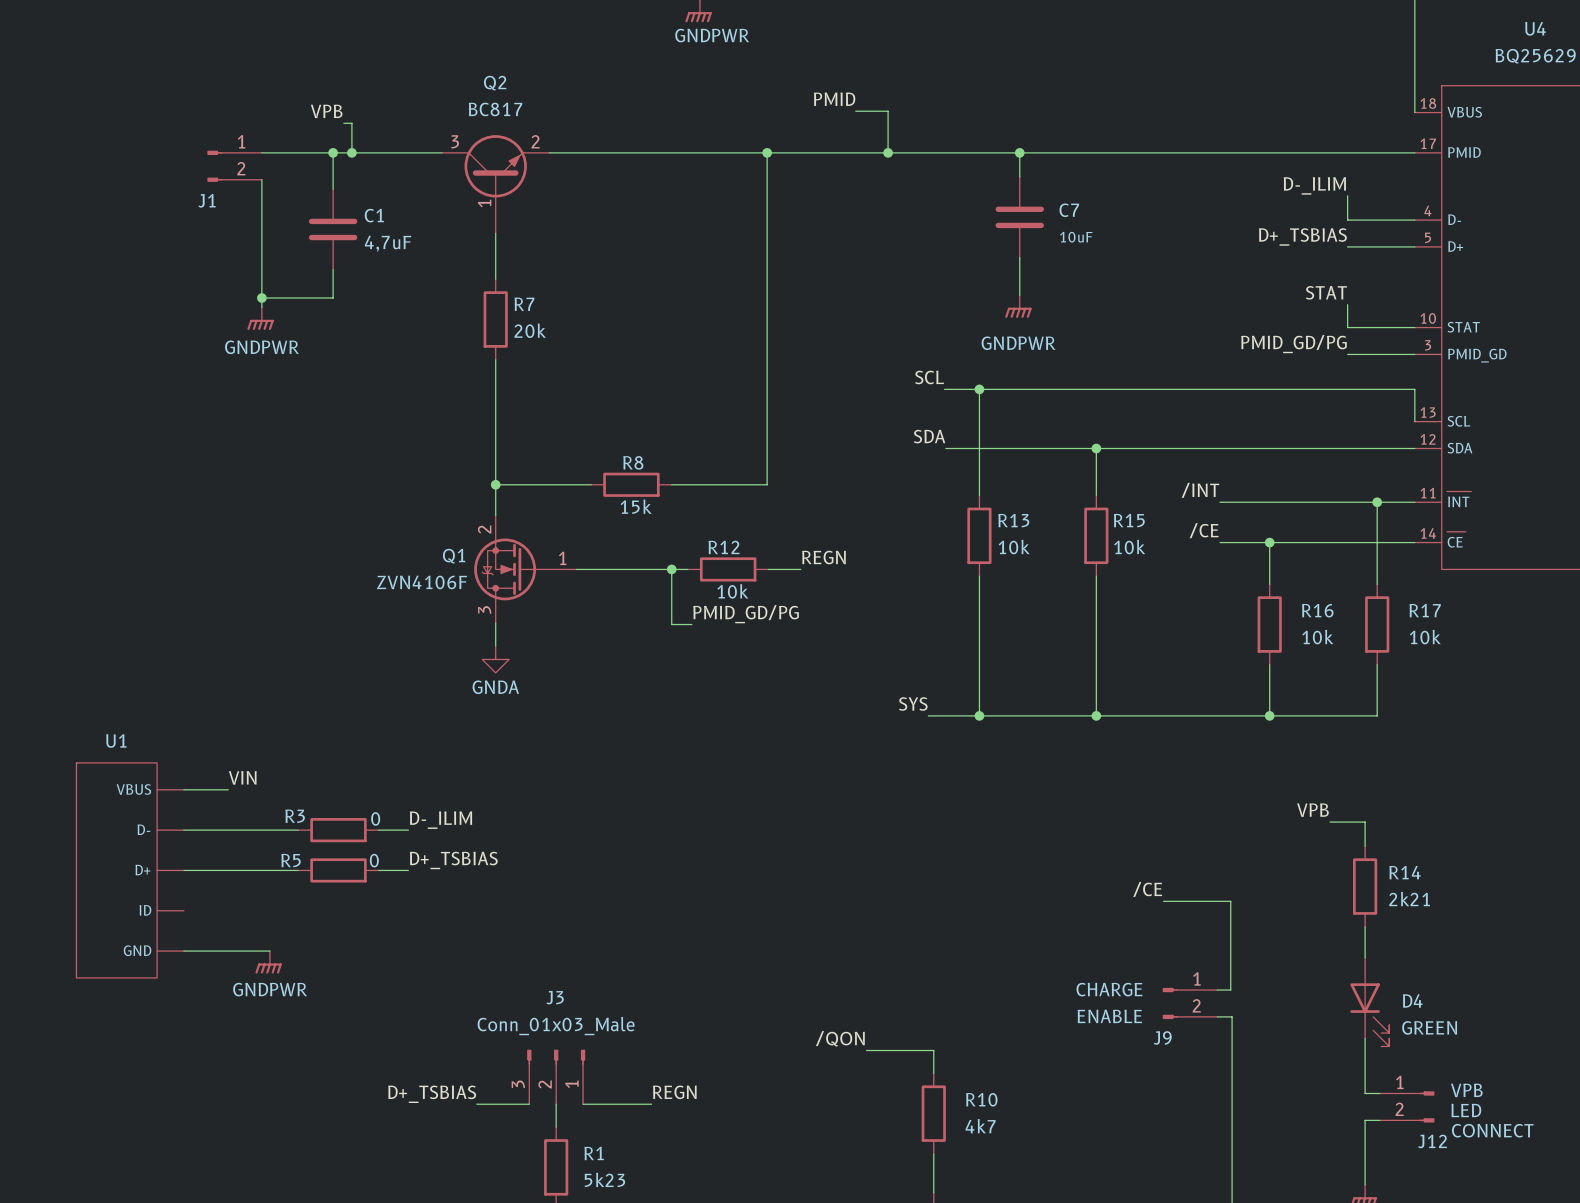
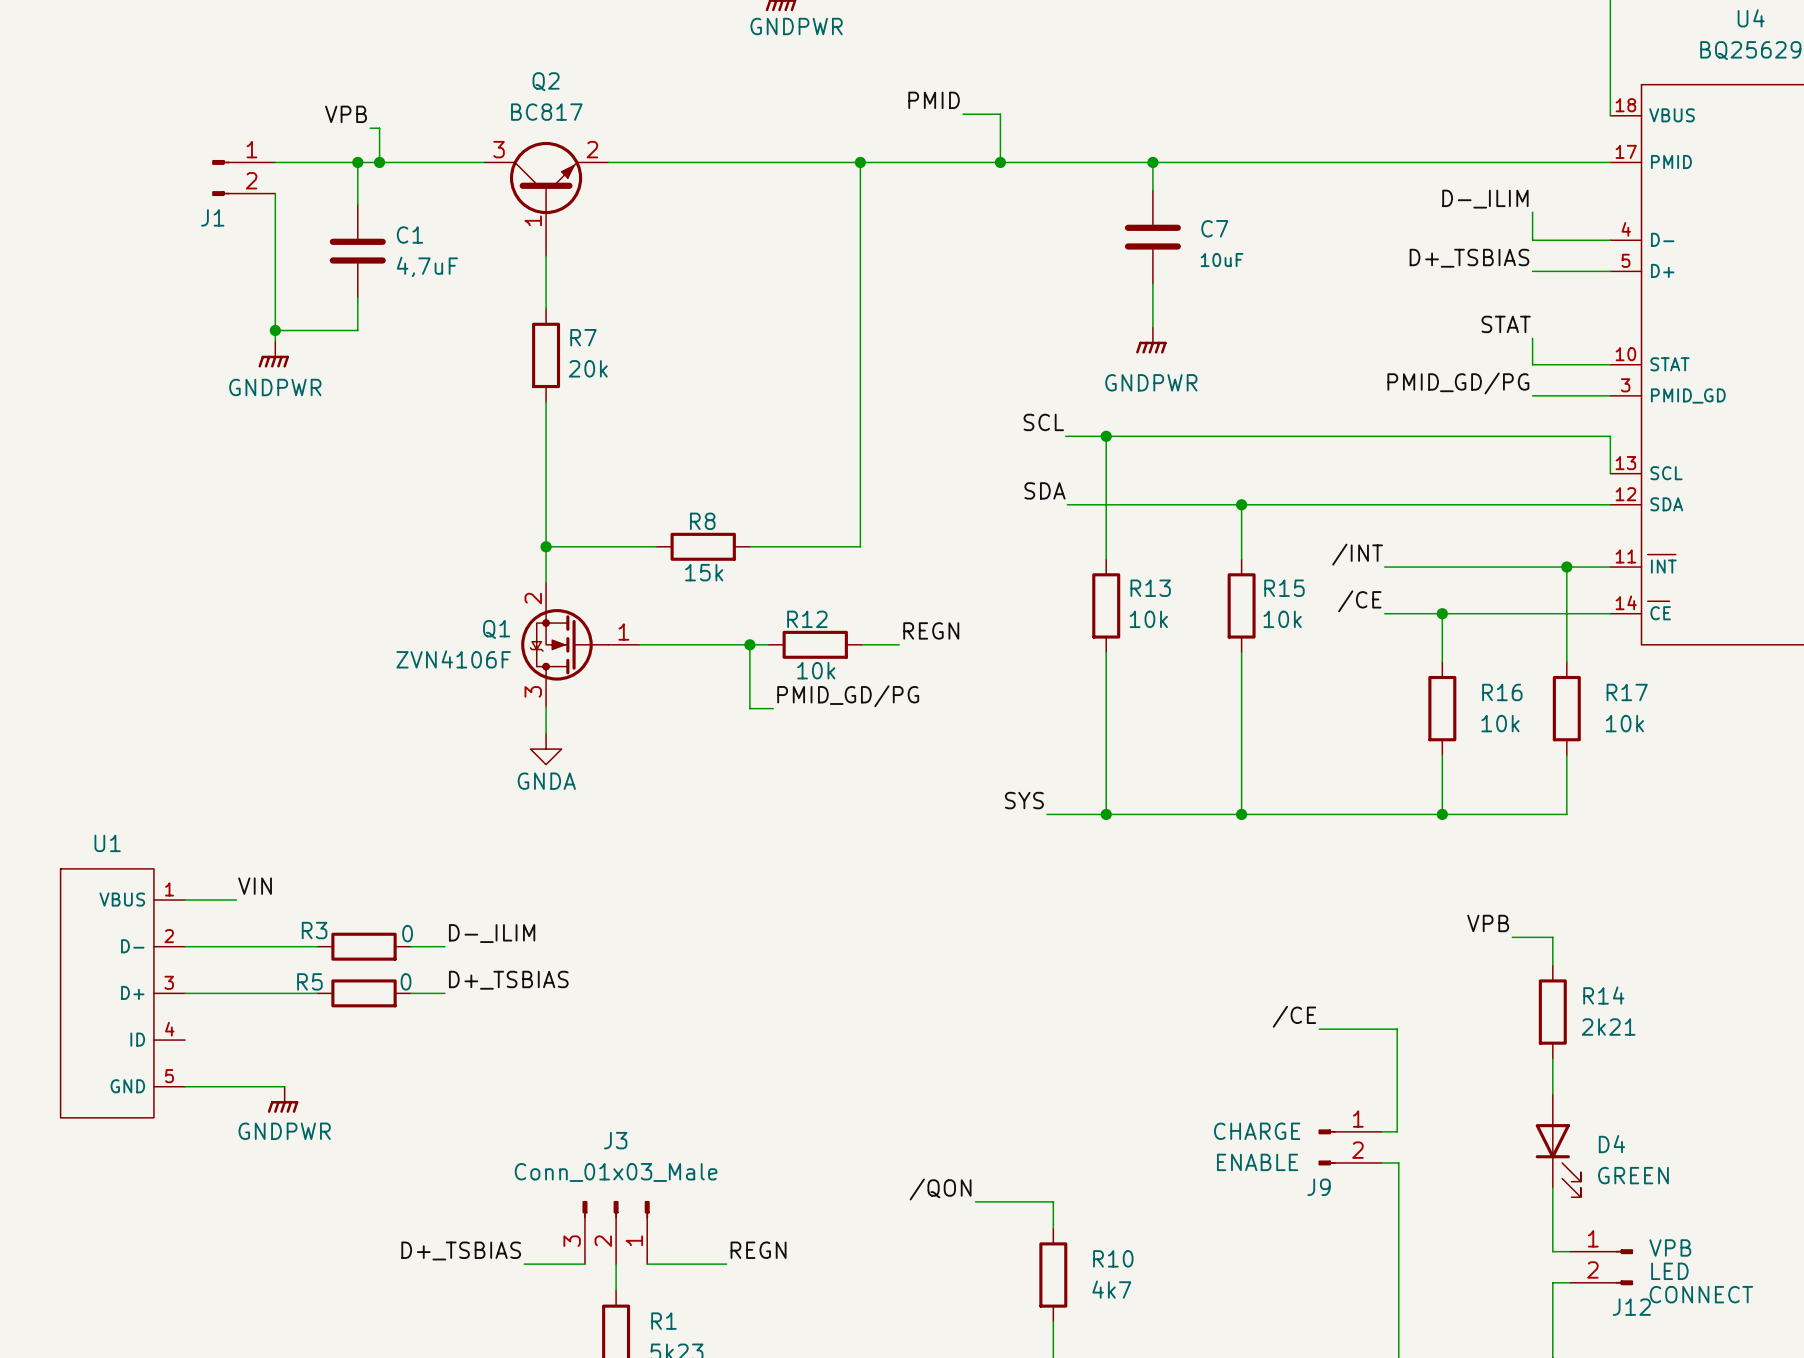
U1 pin number: none -> 1 (169, 889)
U1 pin number: none -> 2 (169, 936)
U1 pin number: none -> 3 (169, 982)
U1 pin number: none -> 4 (169, 1029)
U1 pin number: none -> 5 (169, 1076)

